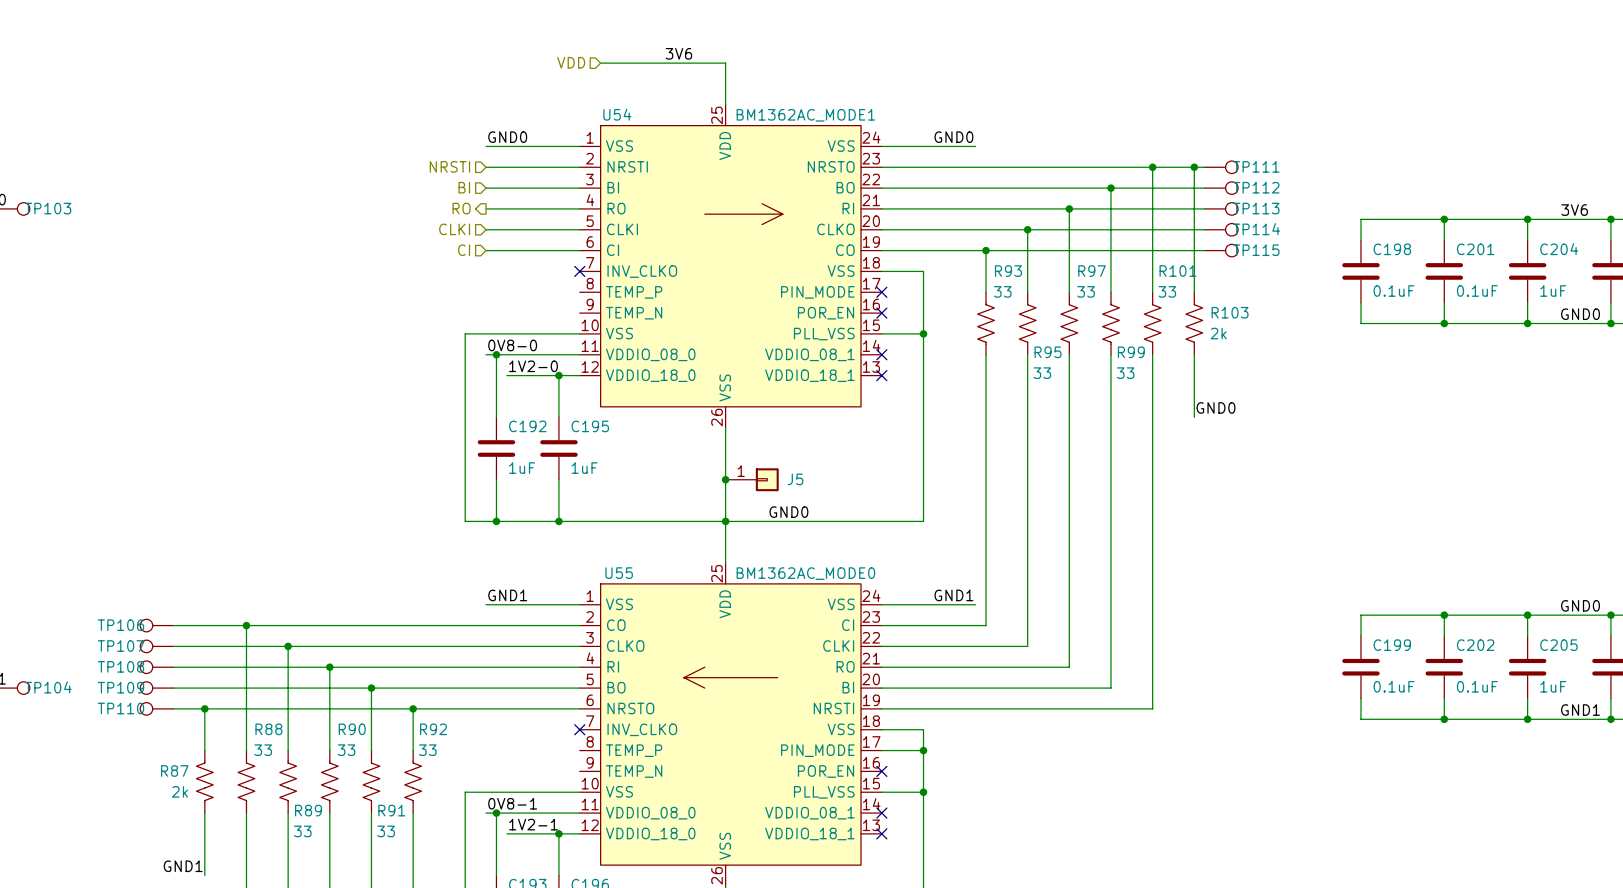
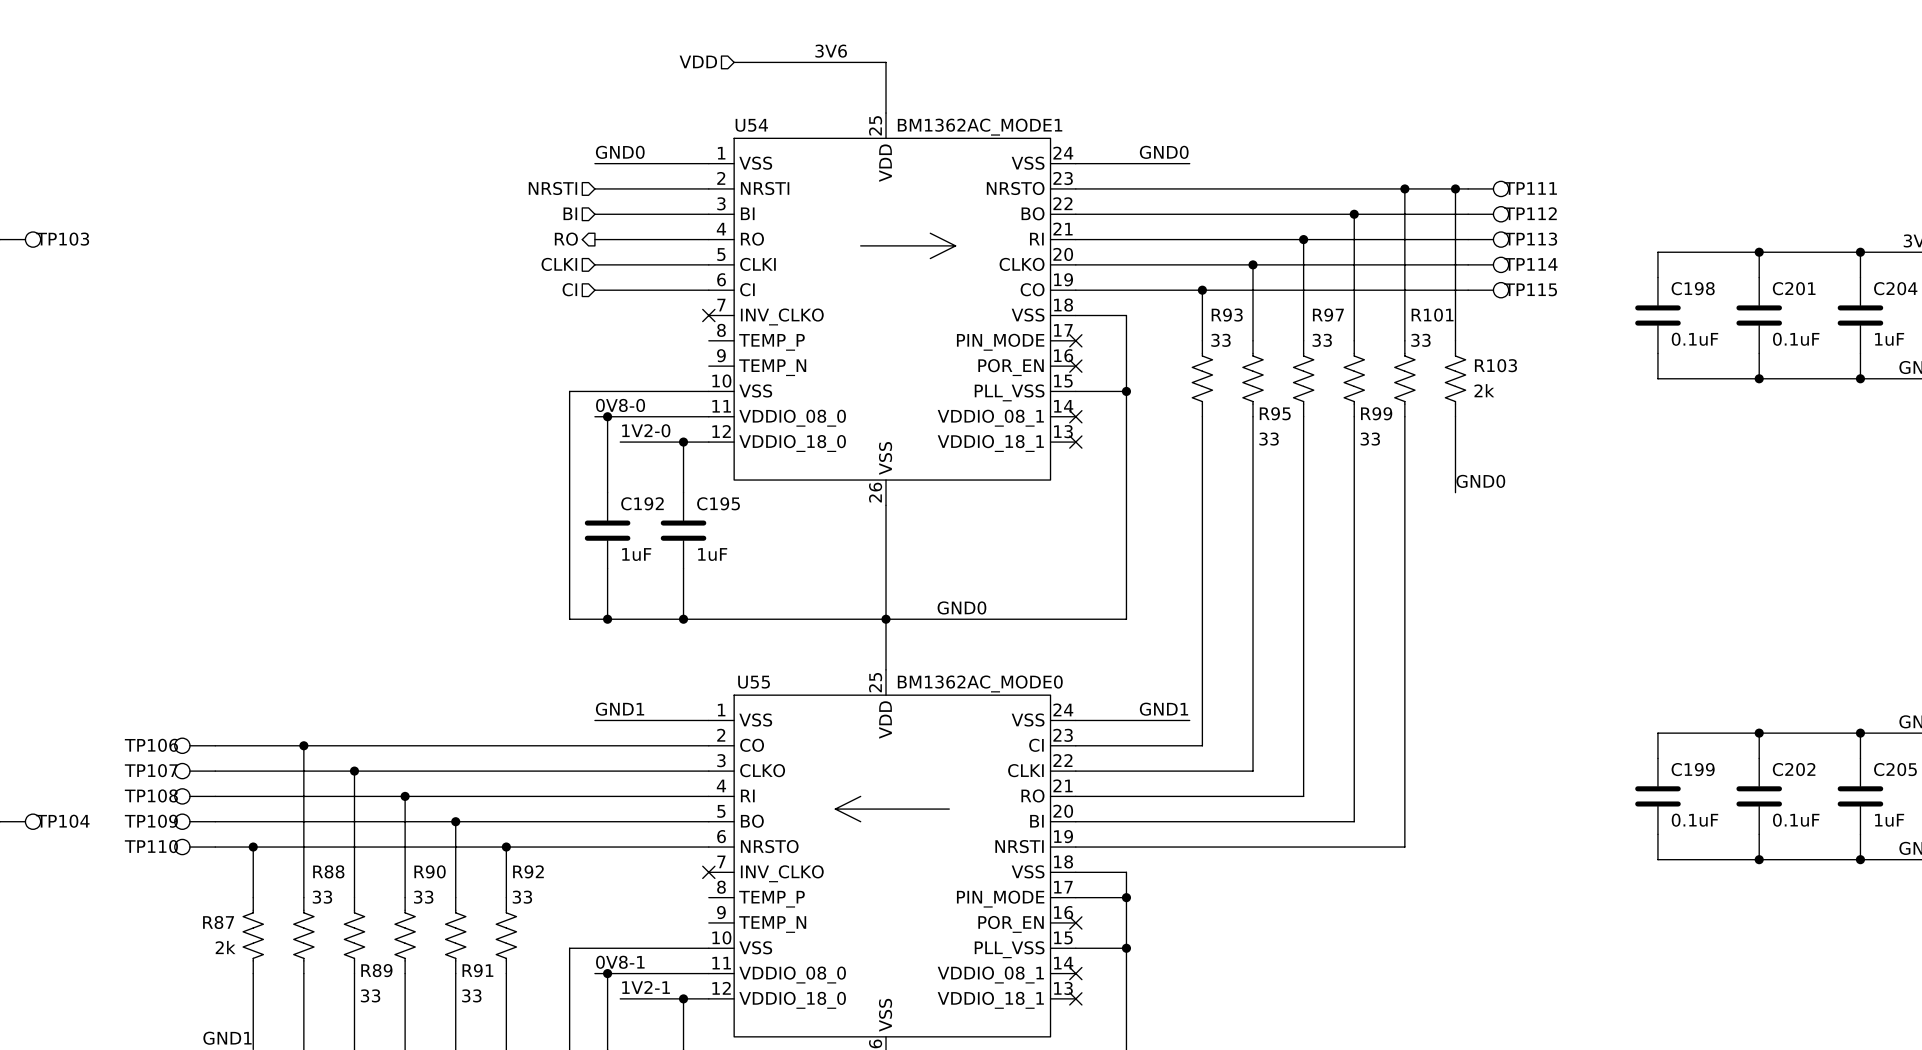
junction: (725, 479) -> none
J5: (752, 479) -> none

